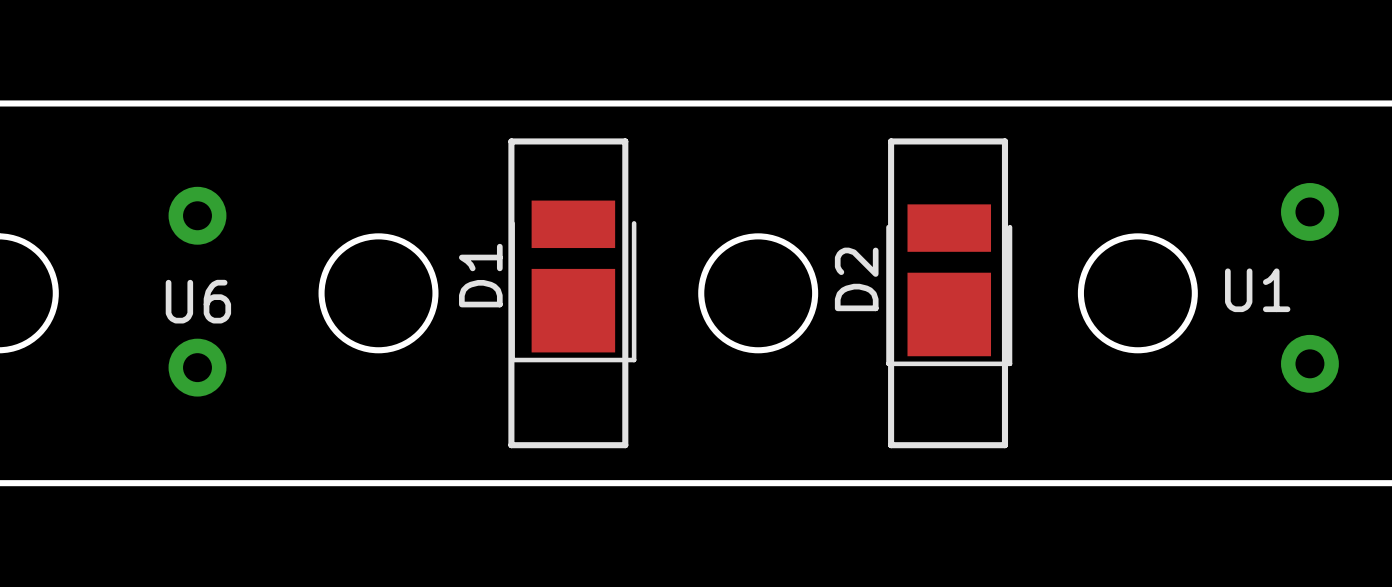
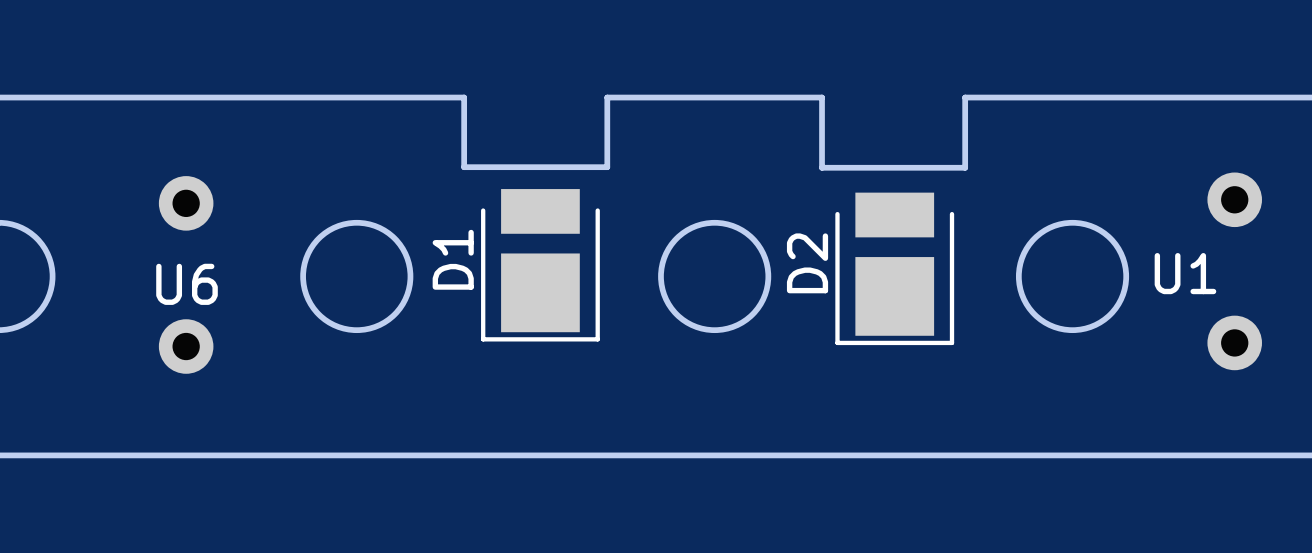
board edge: (492, 103) (644, 103) -> (464, 97) (464, 167) (607, 167) (607, 97)
board edge: (872, 103) (1023, 103) -> (822, 97) (822, 167) (965, 167) (965, 97)
line: (511, 141) (511, 445) (625, 445) (625, 141) (511, 141) -> none
line: (891, 141) (891, 445) (1004, 445) (1004, 141) (891, 141) -> none

